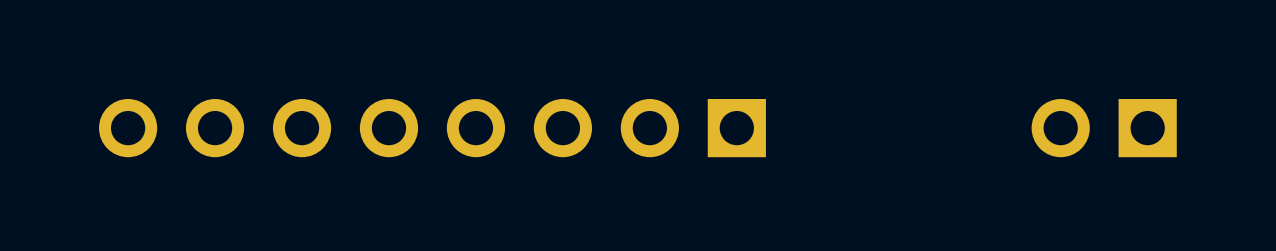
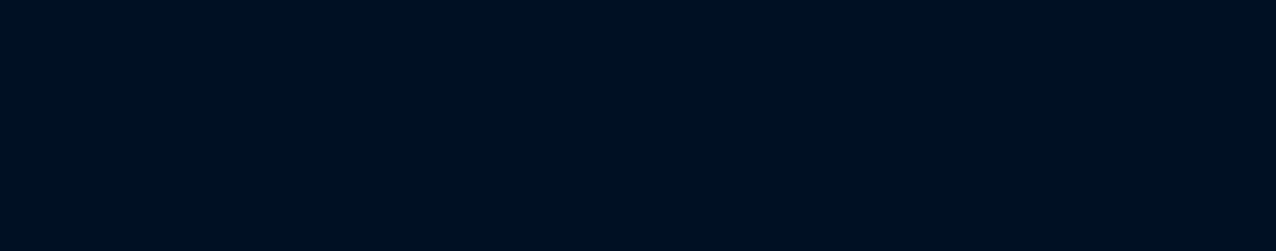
part: (432, 128) -> none
part: (1104, 128) -> none

